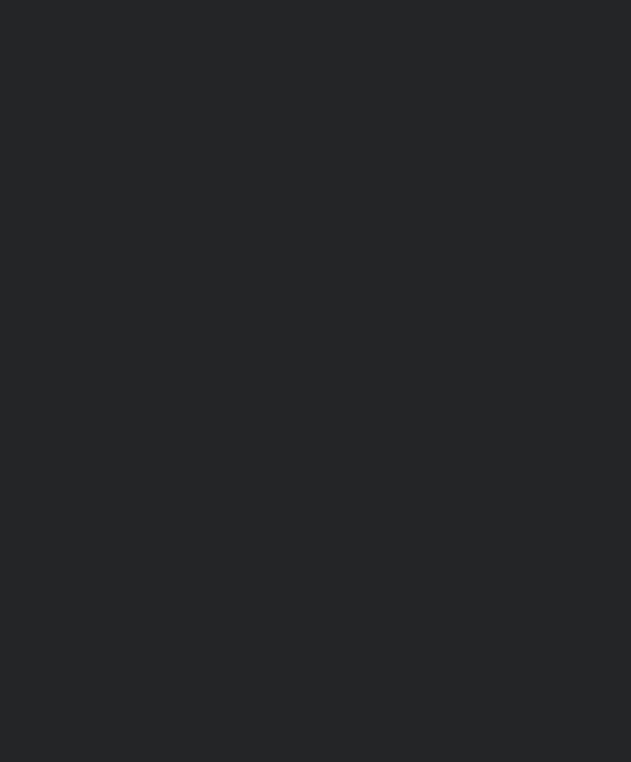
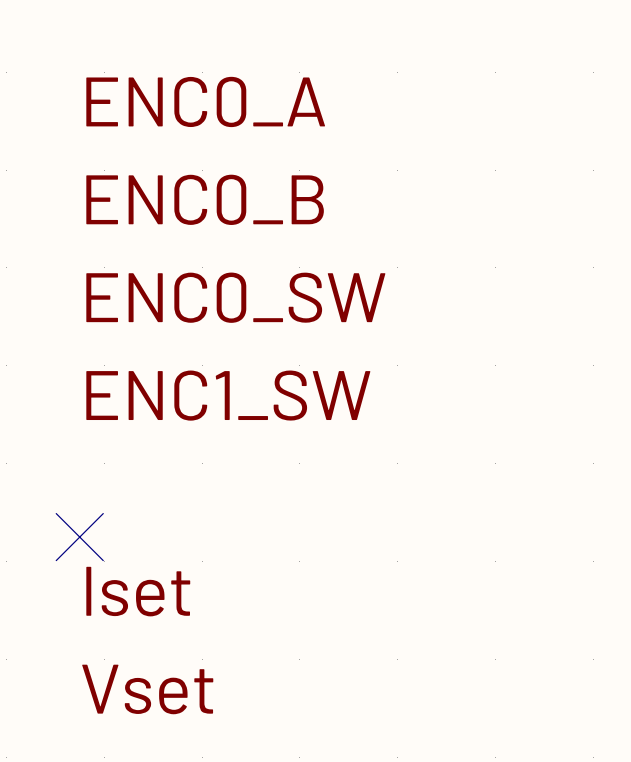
label: none -> ENC0_A (205, 101)
label: none -> ENC0_B (205, 199)
label: none -> ENC0_SW (235, 297)
label: none -> ENC1_SW (228, 395)
no-connect mark: none -> (79, 537)
label: none -> Iset (138, 591)
label: none -> Vset (147, 689)

